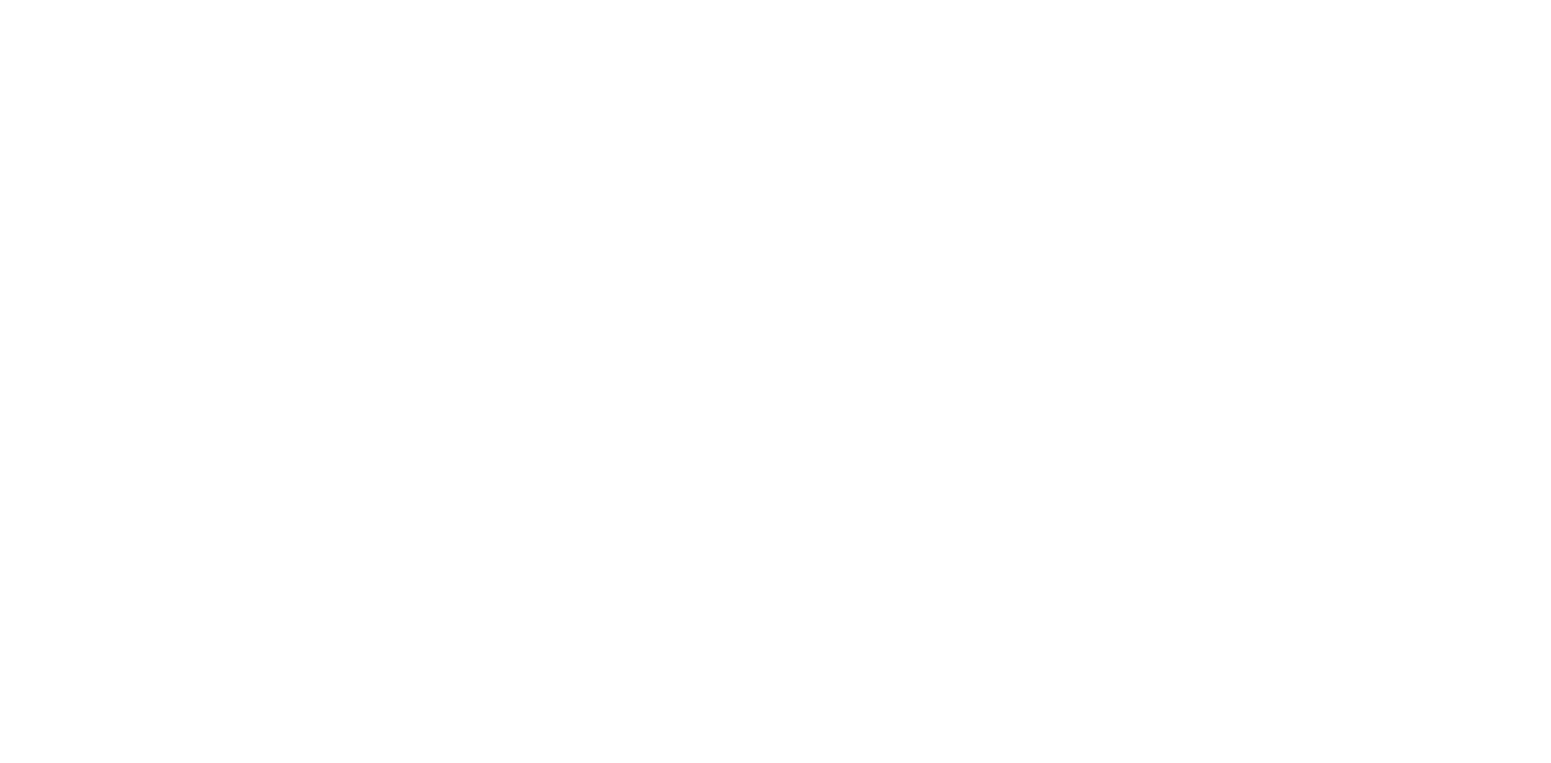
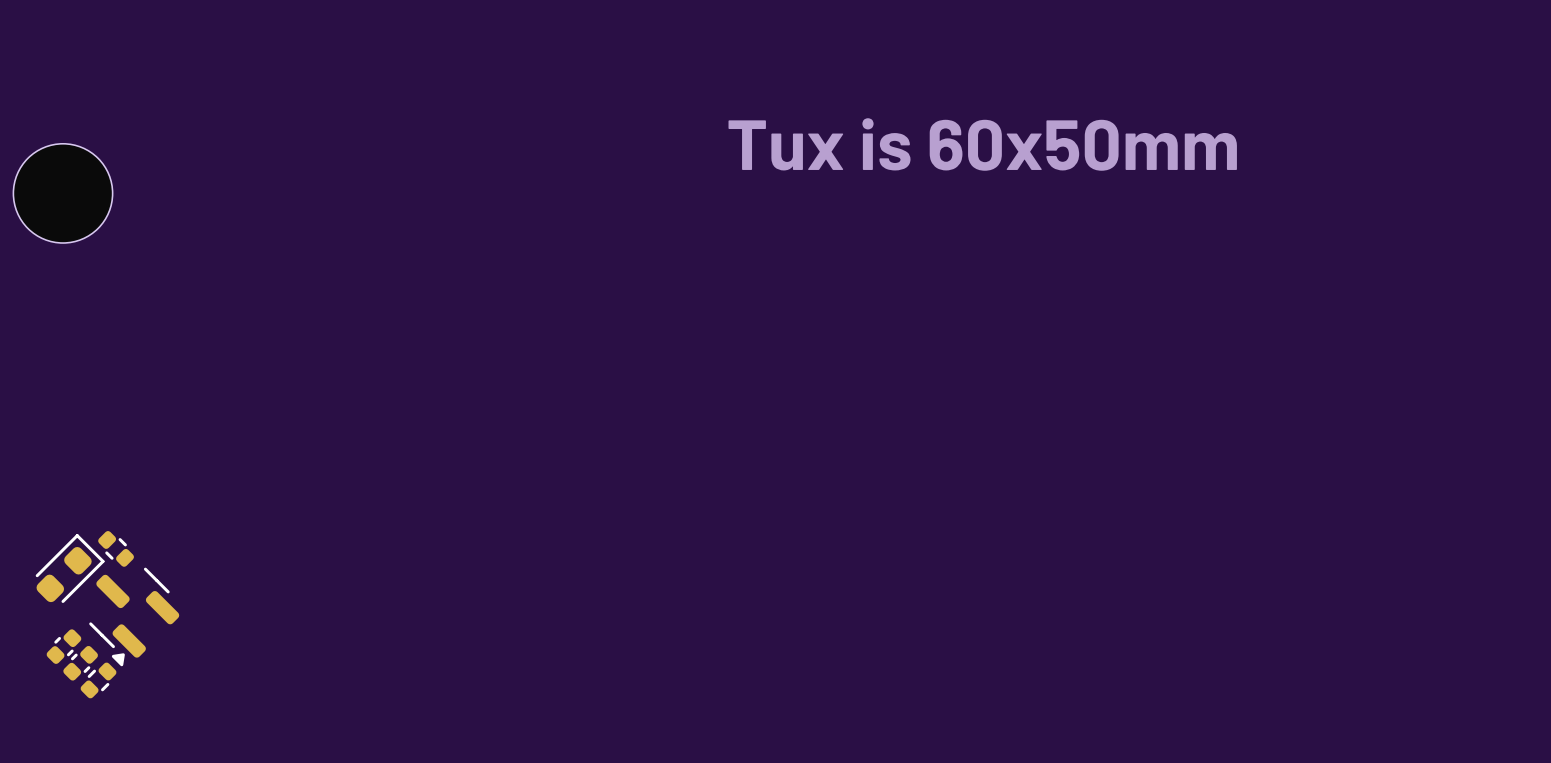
text: none -> Tux is 60x50mm (982, 144)
part: none -> (63, 193)
part: none -> (116, 548)
part: none -> (70, 568)
part: none -> (134, 616)
part: none -> (63, 646)
part: none -> (80, 663)
part: none -> (98, 680)

